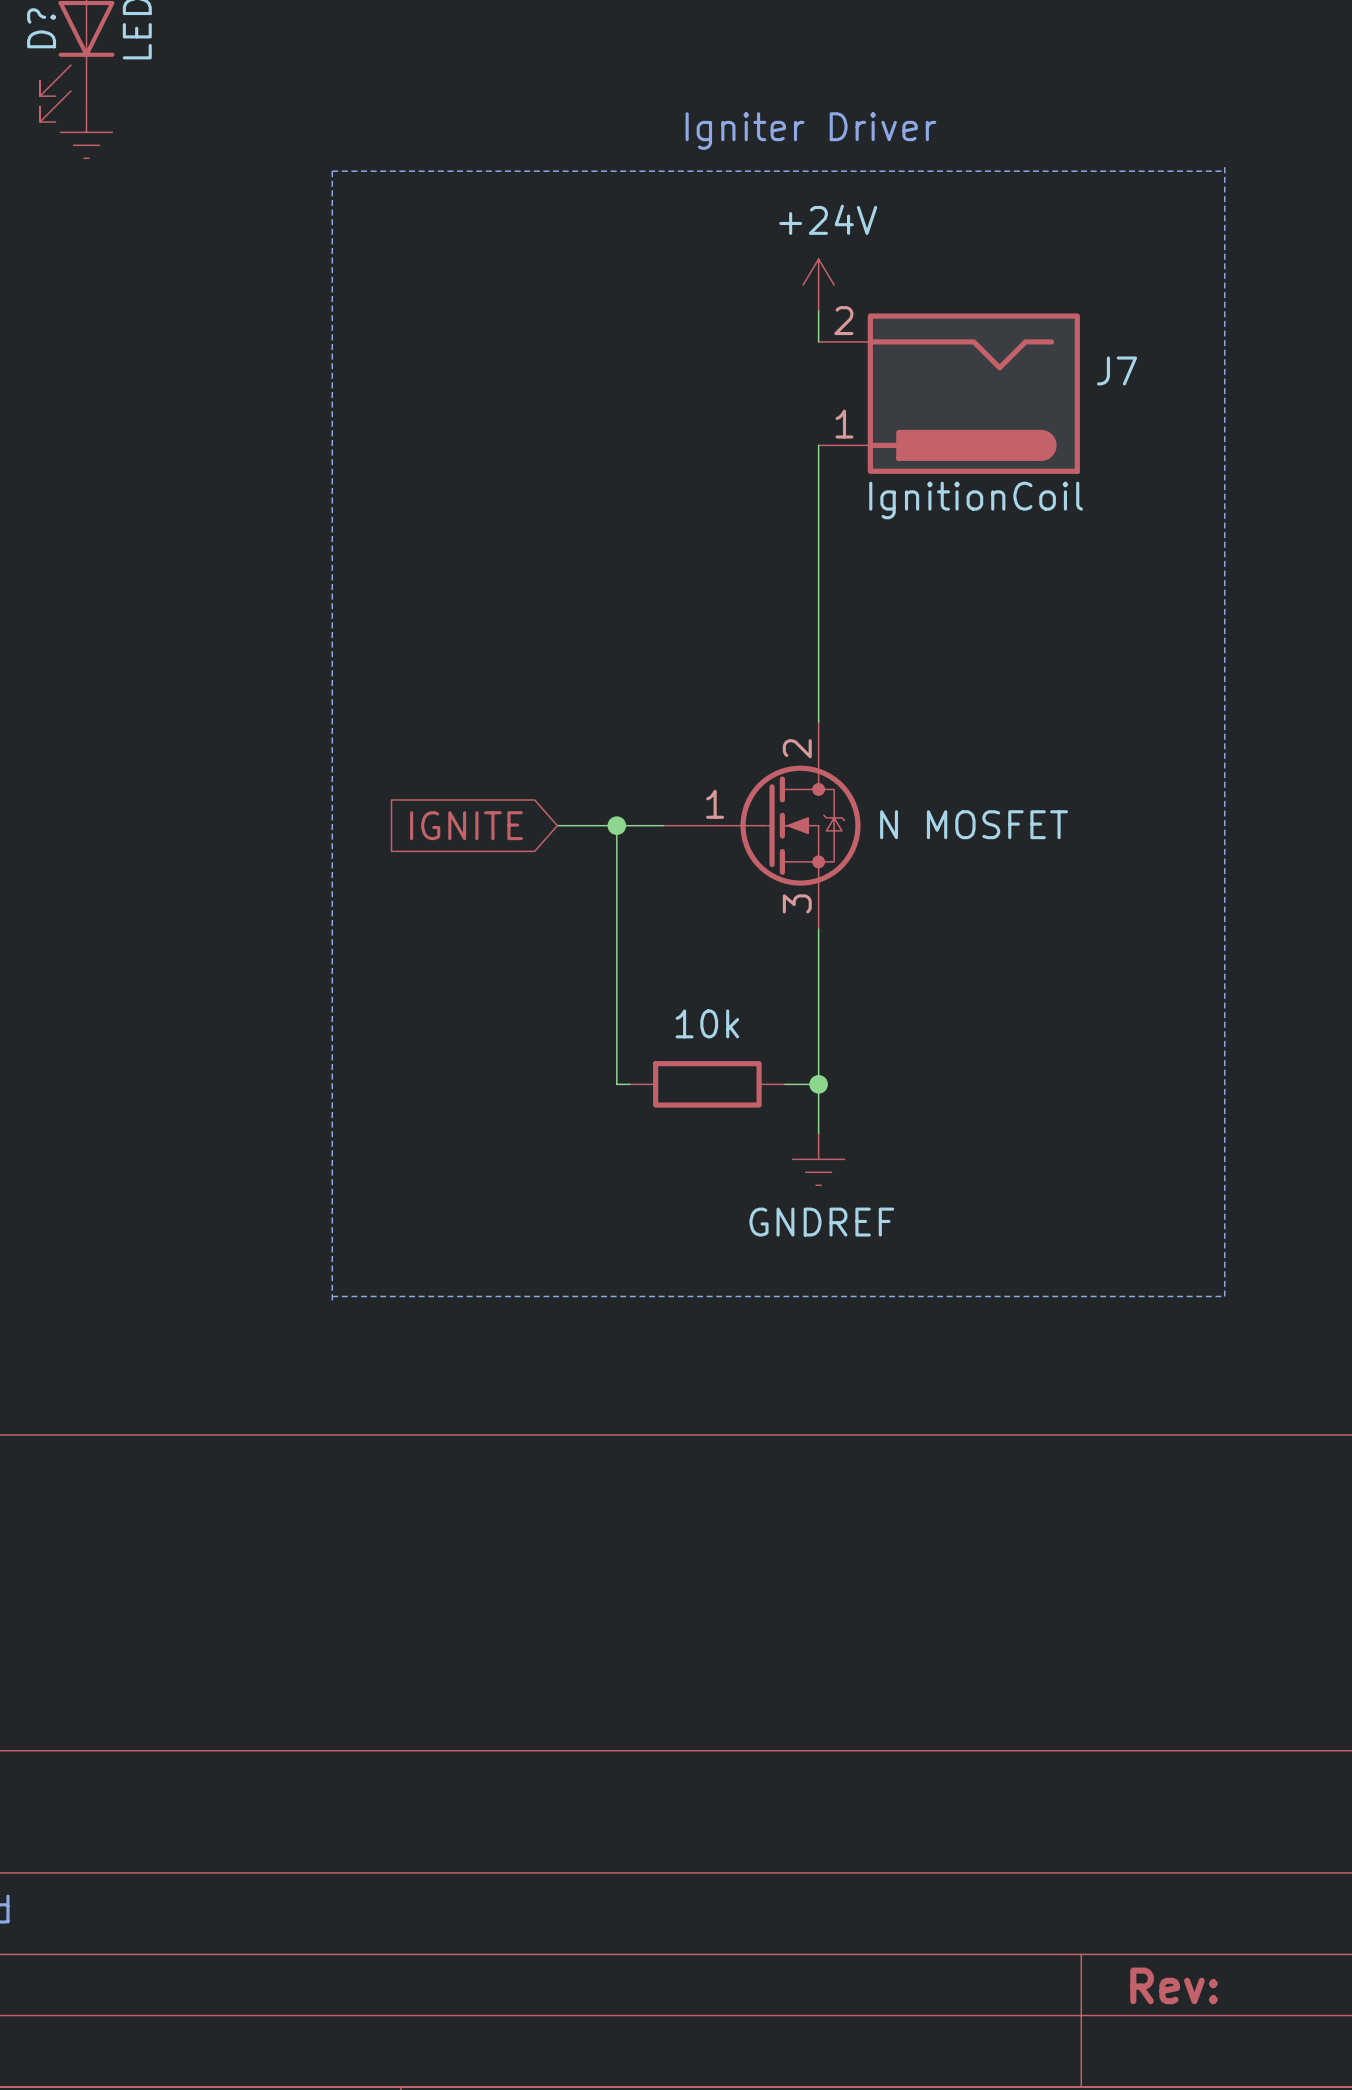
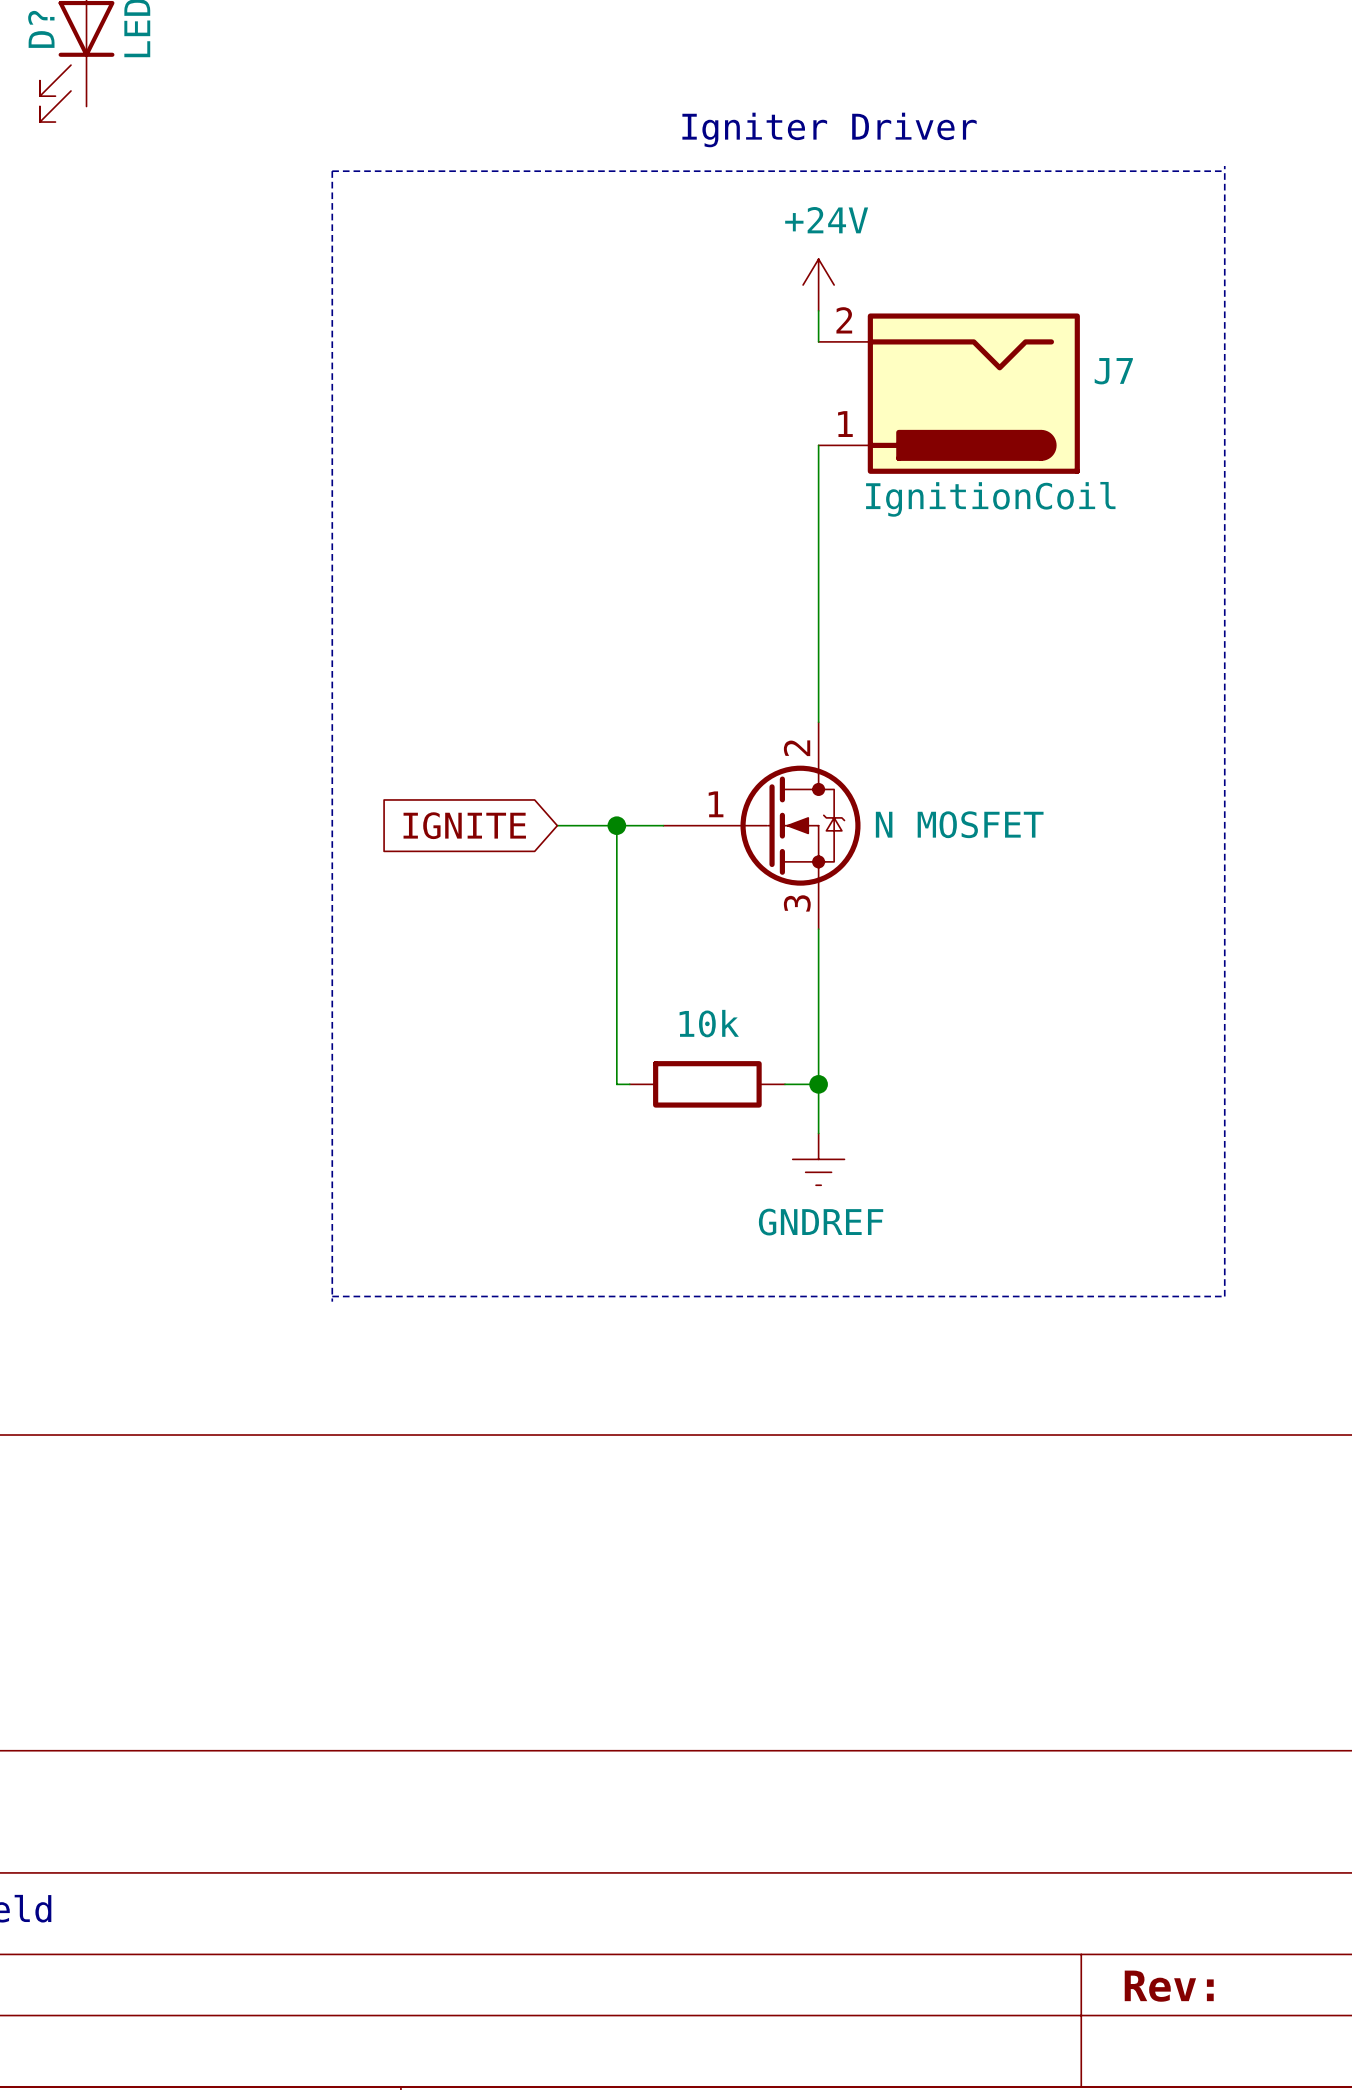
power symbol: (86, 132) -> none

